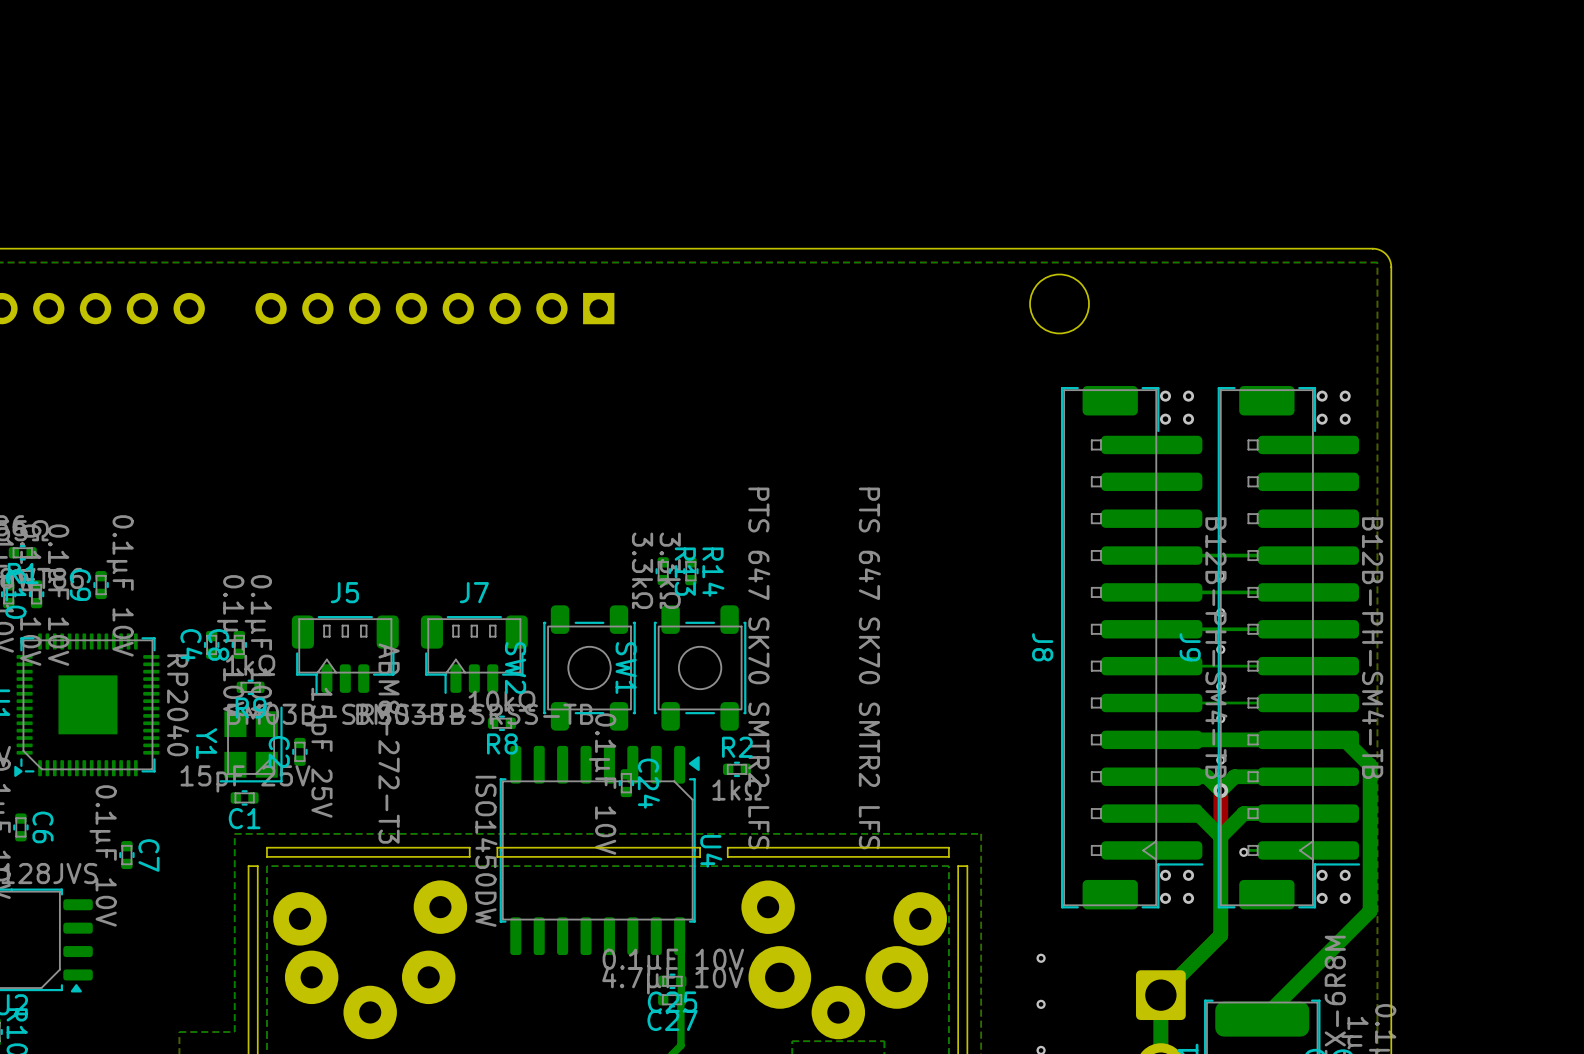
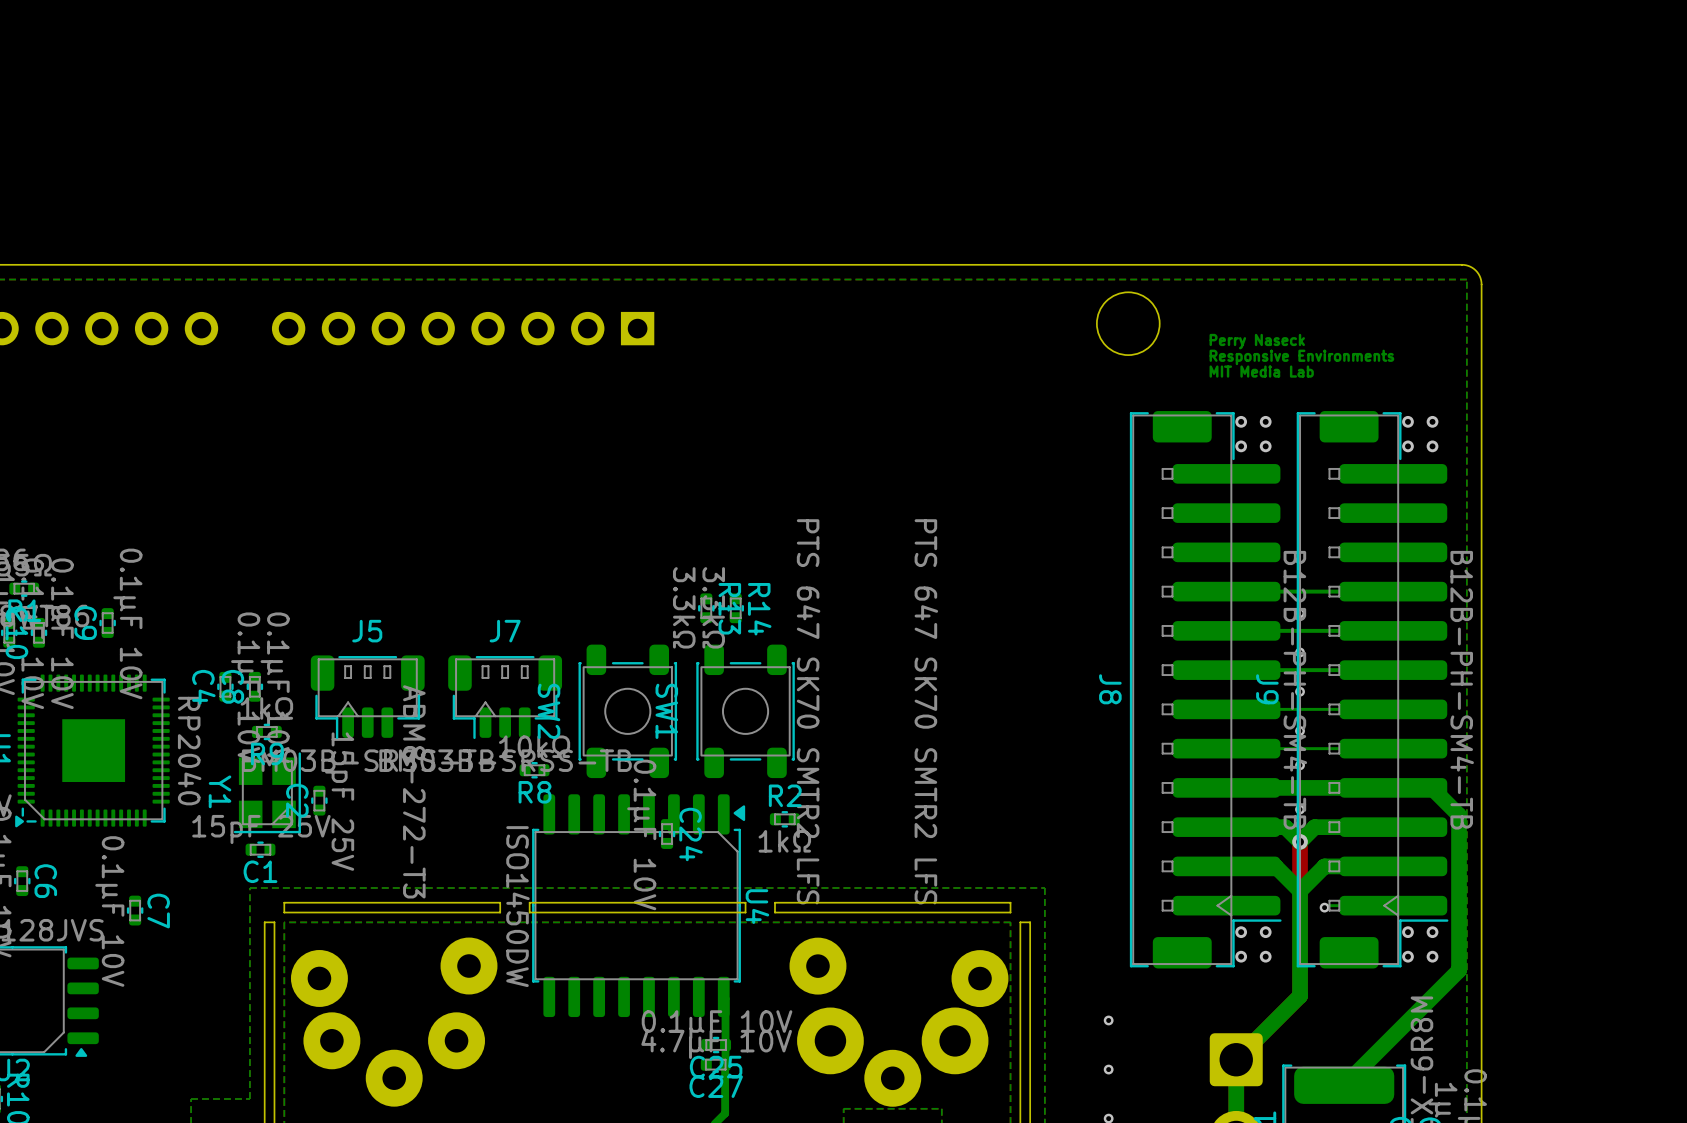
text: none -> Perry Naseck (1257, 341)
text: none -> Responsive Environments (1301, 357)
text: none -> MIT Media Lab (1261, 371)

